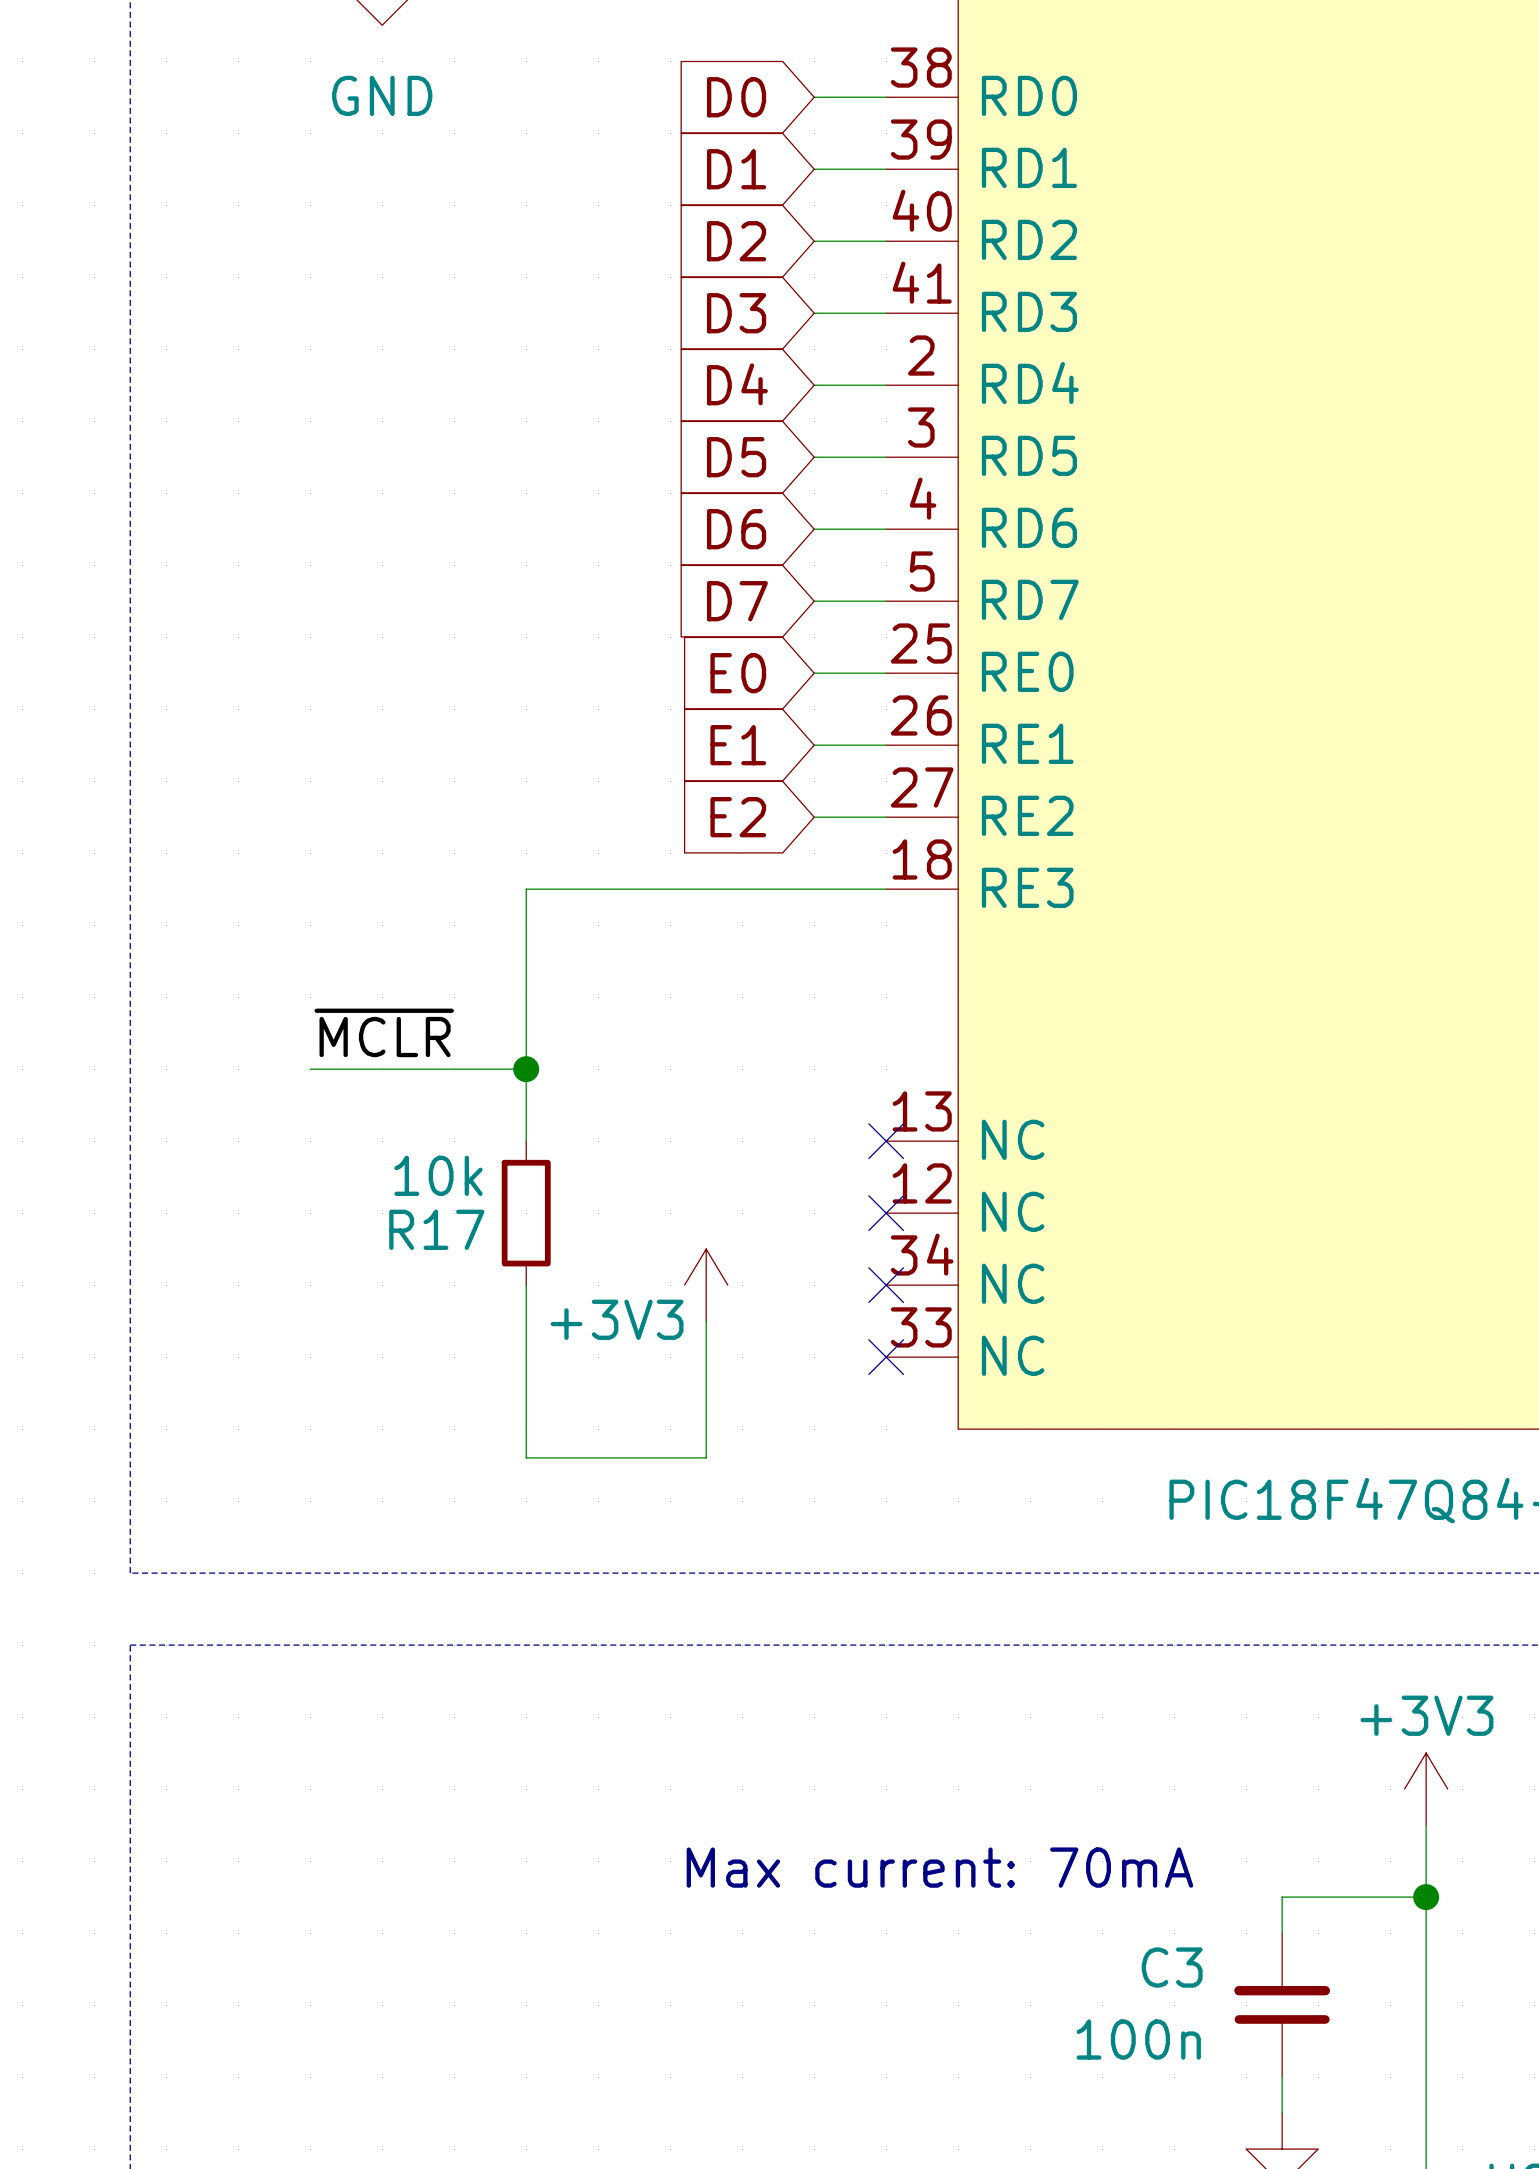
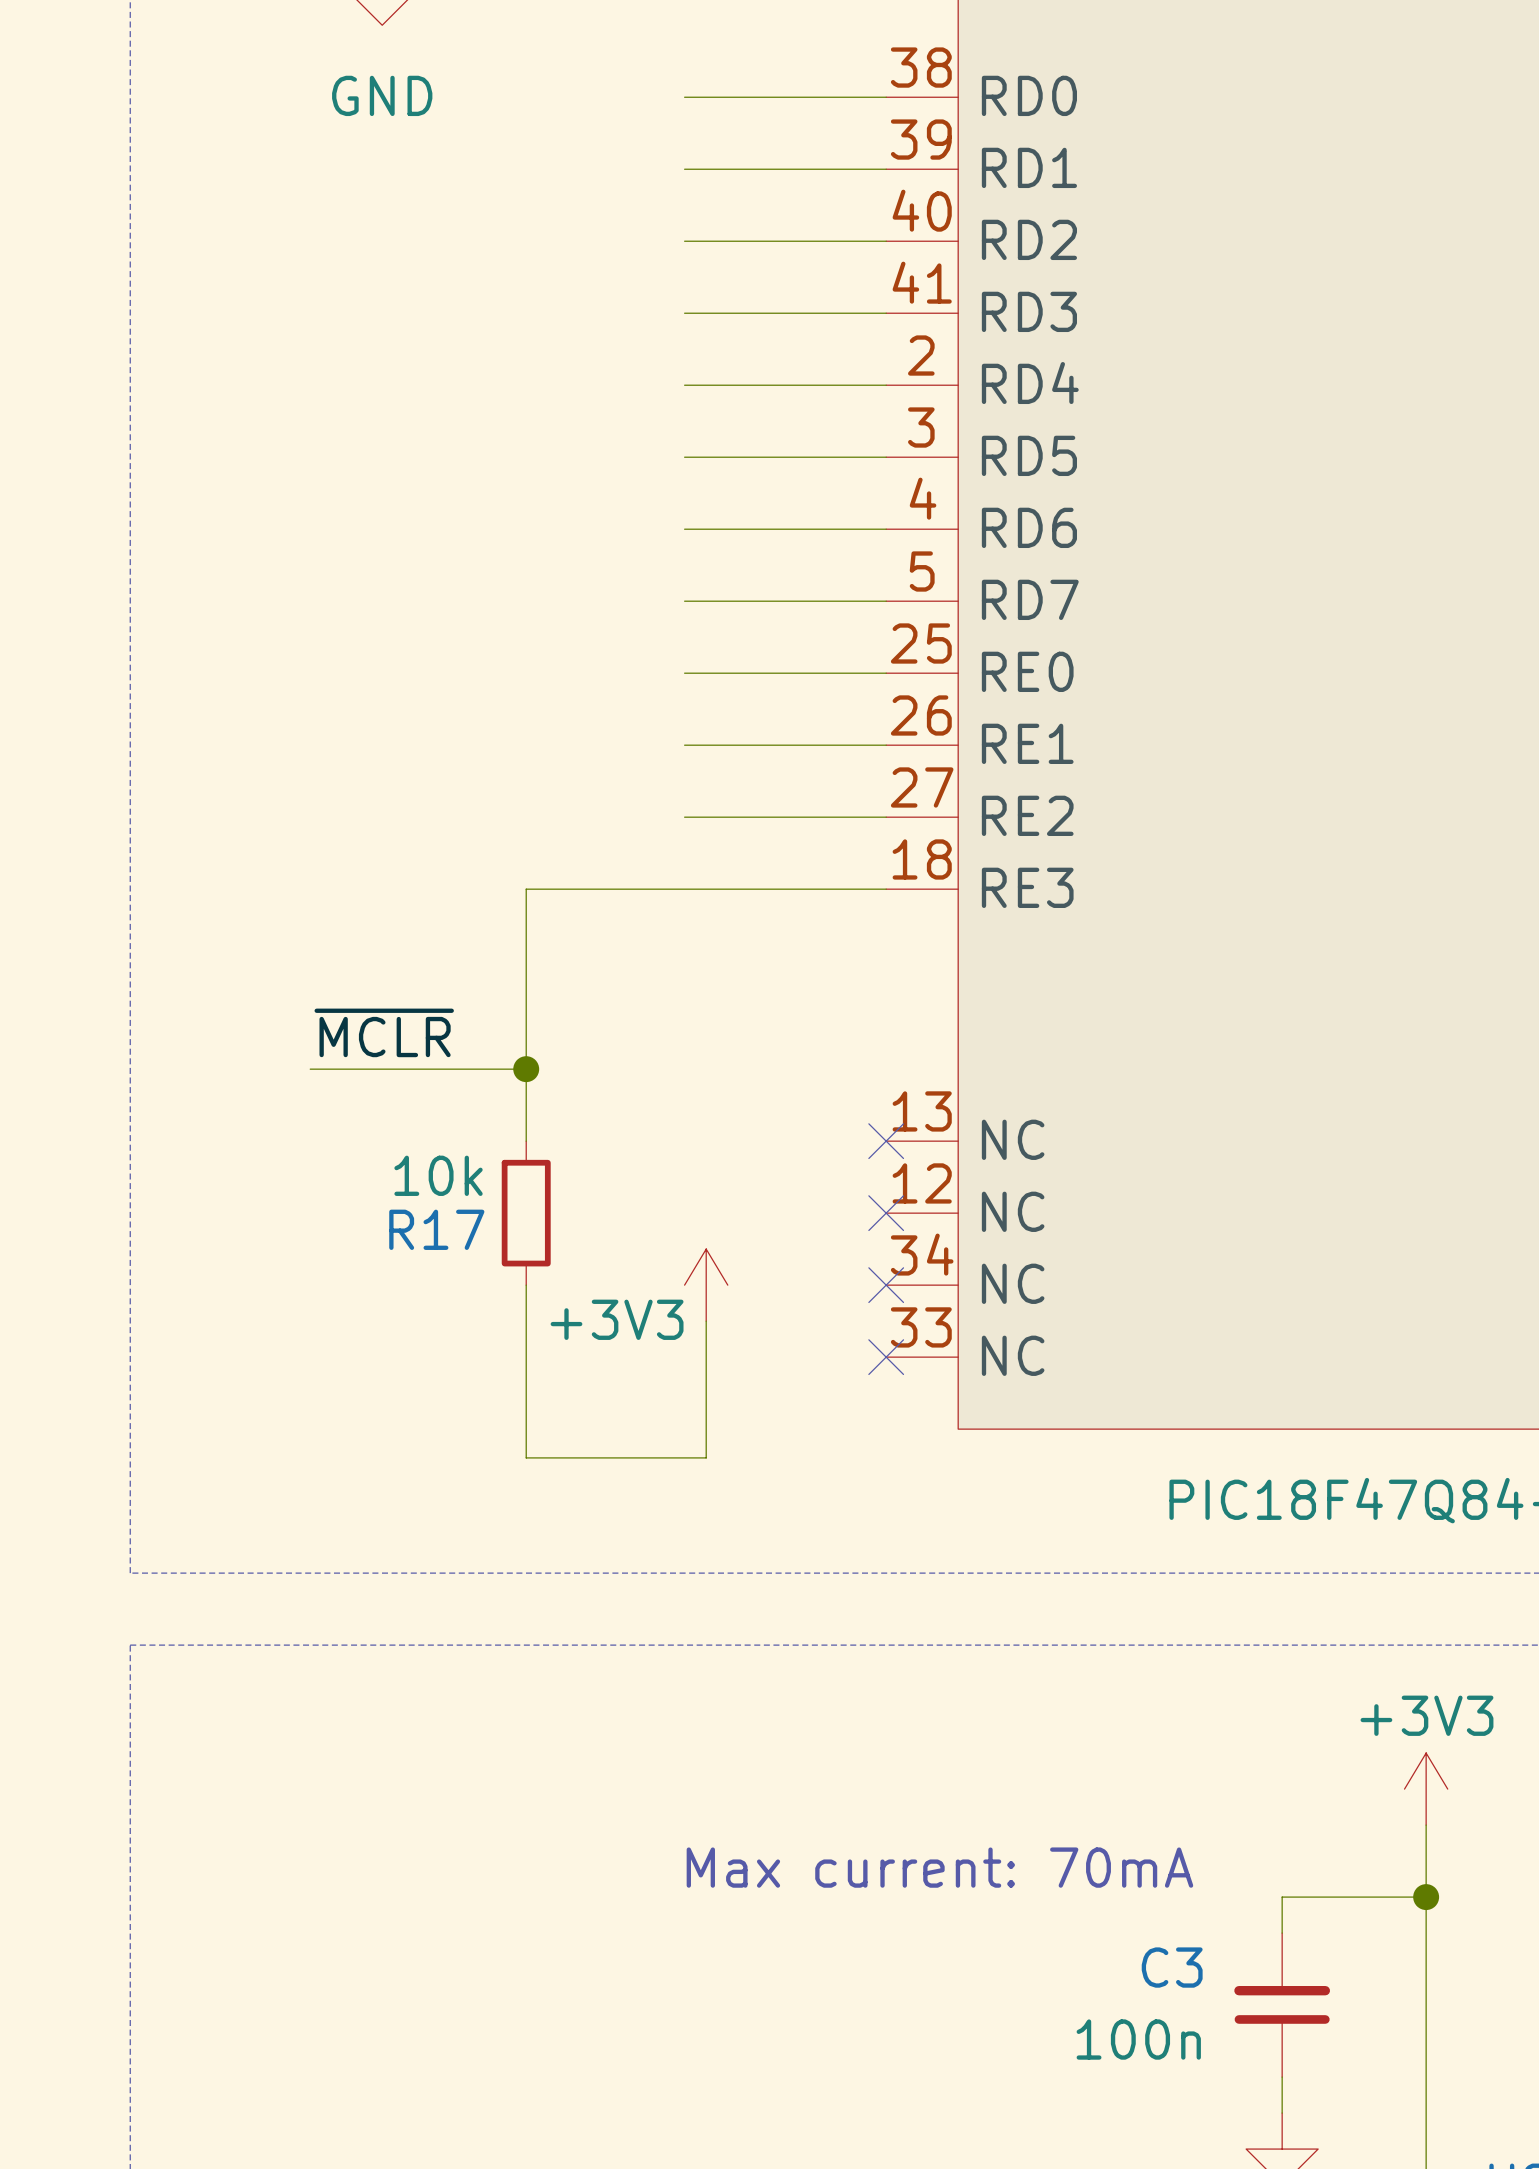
wire: none -> (684, 97) (814, 97)
global label: D0 (736, 97) -> none
wire: none -> (684, 169) (814, 169)
global label: D1 (736, 169) -> none
wire: none -> (684, 241) (814, 241)
global label: D2 (736, 241) -> none
wire: none -> (684, 313) (814, 313)
global label: D3 (736, 313) -> none
global label: D4 (737, 384) -> none
wire: none -> (684, 385) (814, 385)
wire: none -> (684, 457) (814, 457)
global label: D5 (736, 457) -> none
wire: none -> (684, 529) (814, 529)
global label: D6 (736, 529) -> none
wire: none -> (684, 601) (814, 601)
global label: D7 (737, 601) -> none
wire: none -> (684, 673) (814, 673)
global label: E0 (738, 673) -> none
wire: none -> (684, 745) (814, 745)
global label: E1 (738, 745) -> none
wire: none -> (684, 817) (814, 817)
global label: E2 (738, 817) -> none

